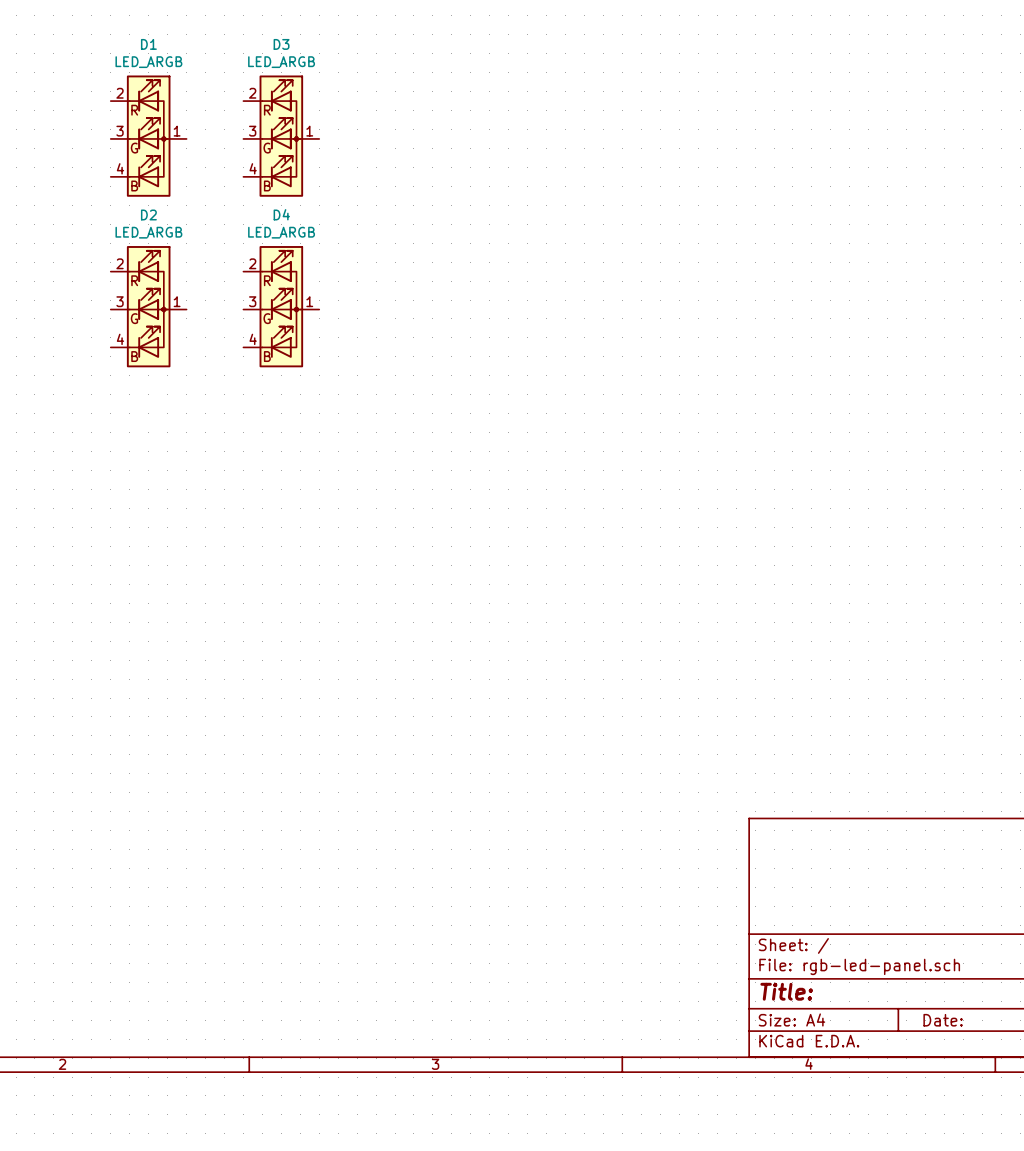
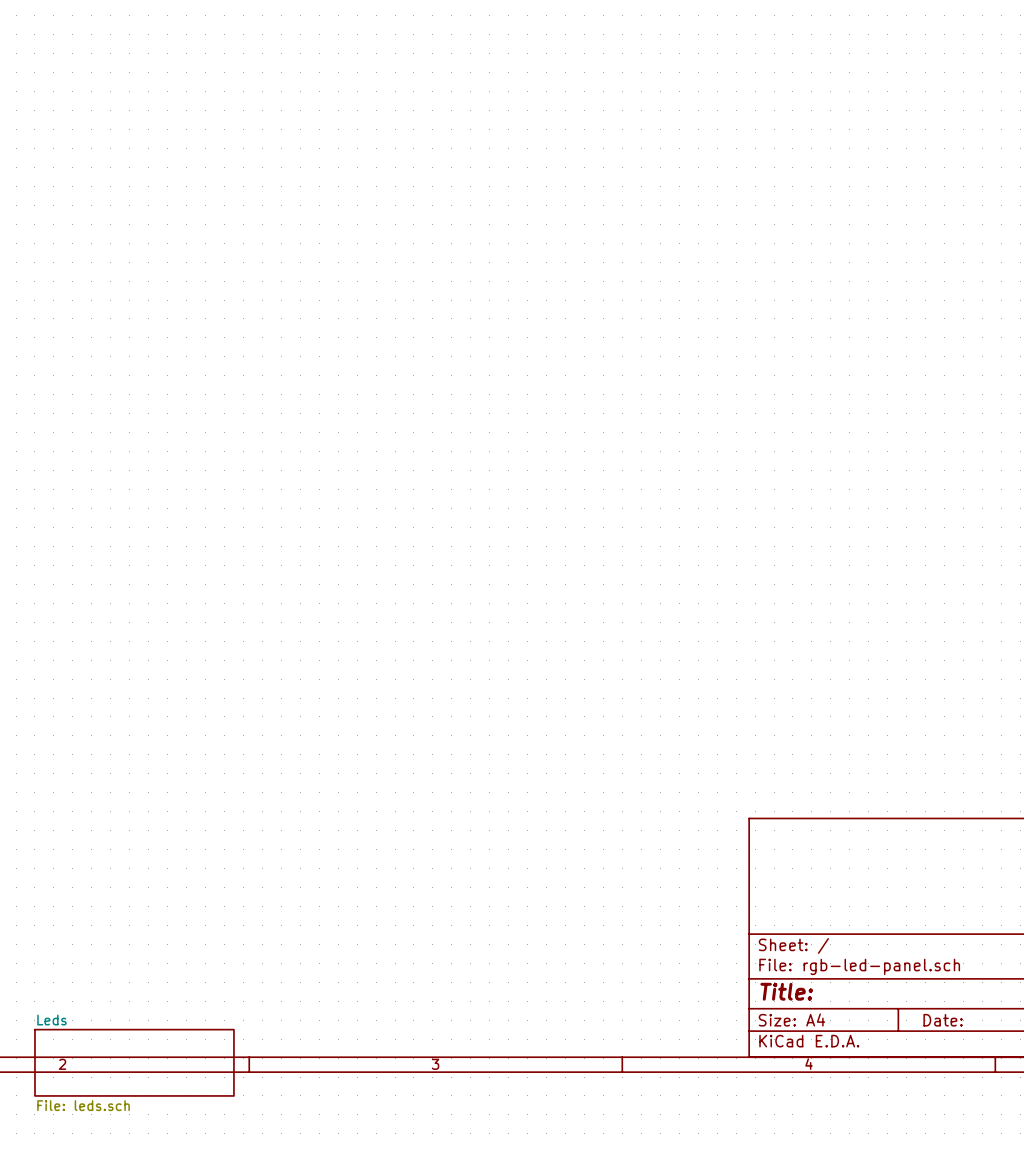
D1: LED_ARGB (148, 136) -> none
D3: LED_ARGB (281, 136) -> none
D2: LED_ARGB (148, 306) -> none
D4: LED_ARGB (281, 306) -> none
sheet Leds: none -> File: leds.sch (134, 1062)

